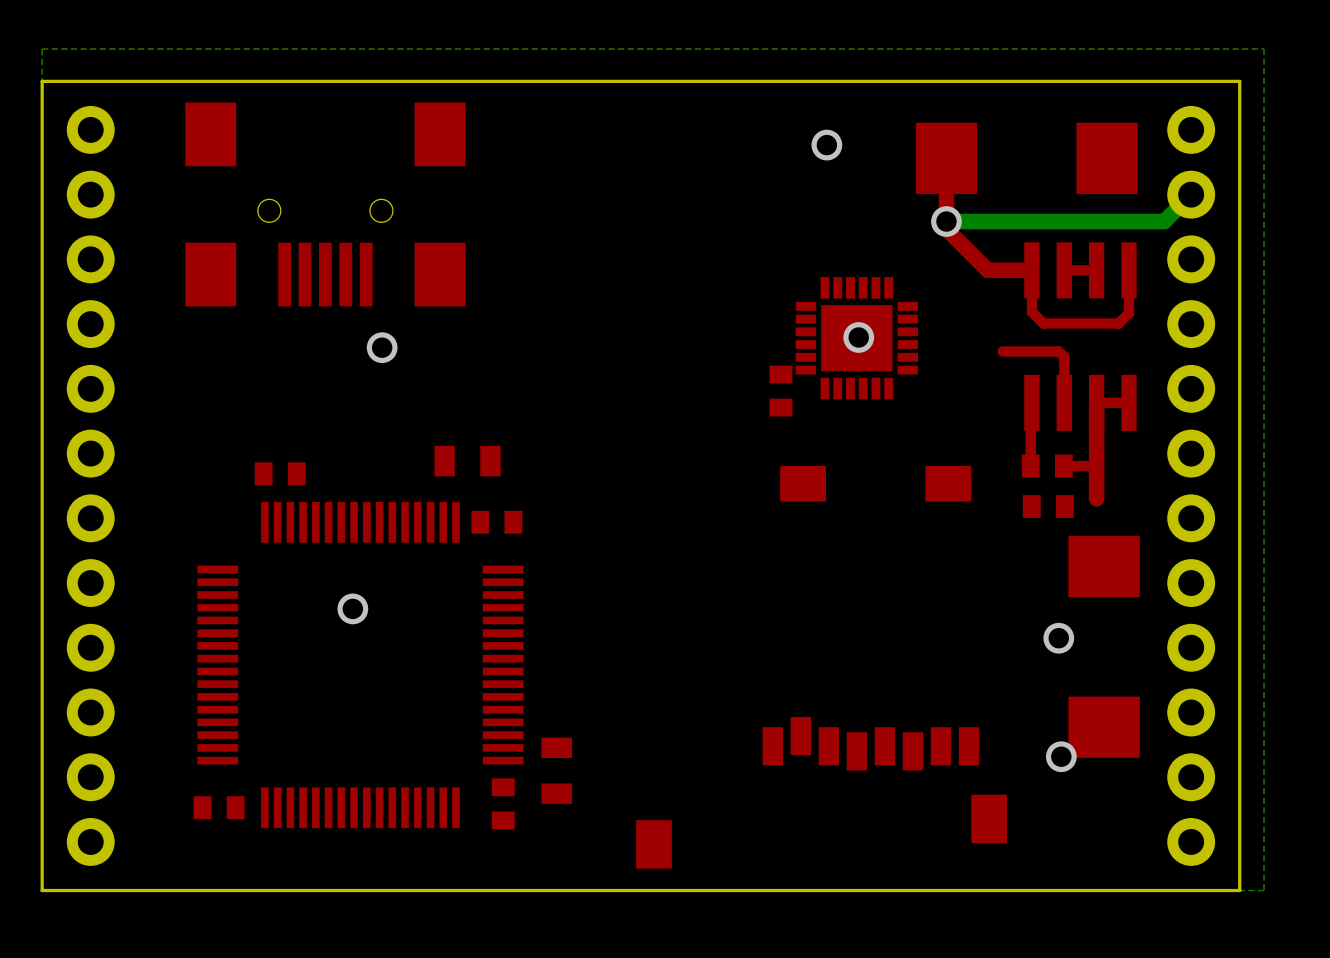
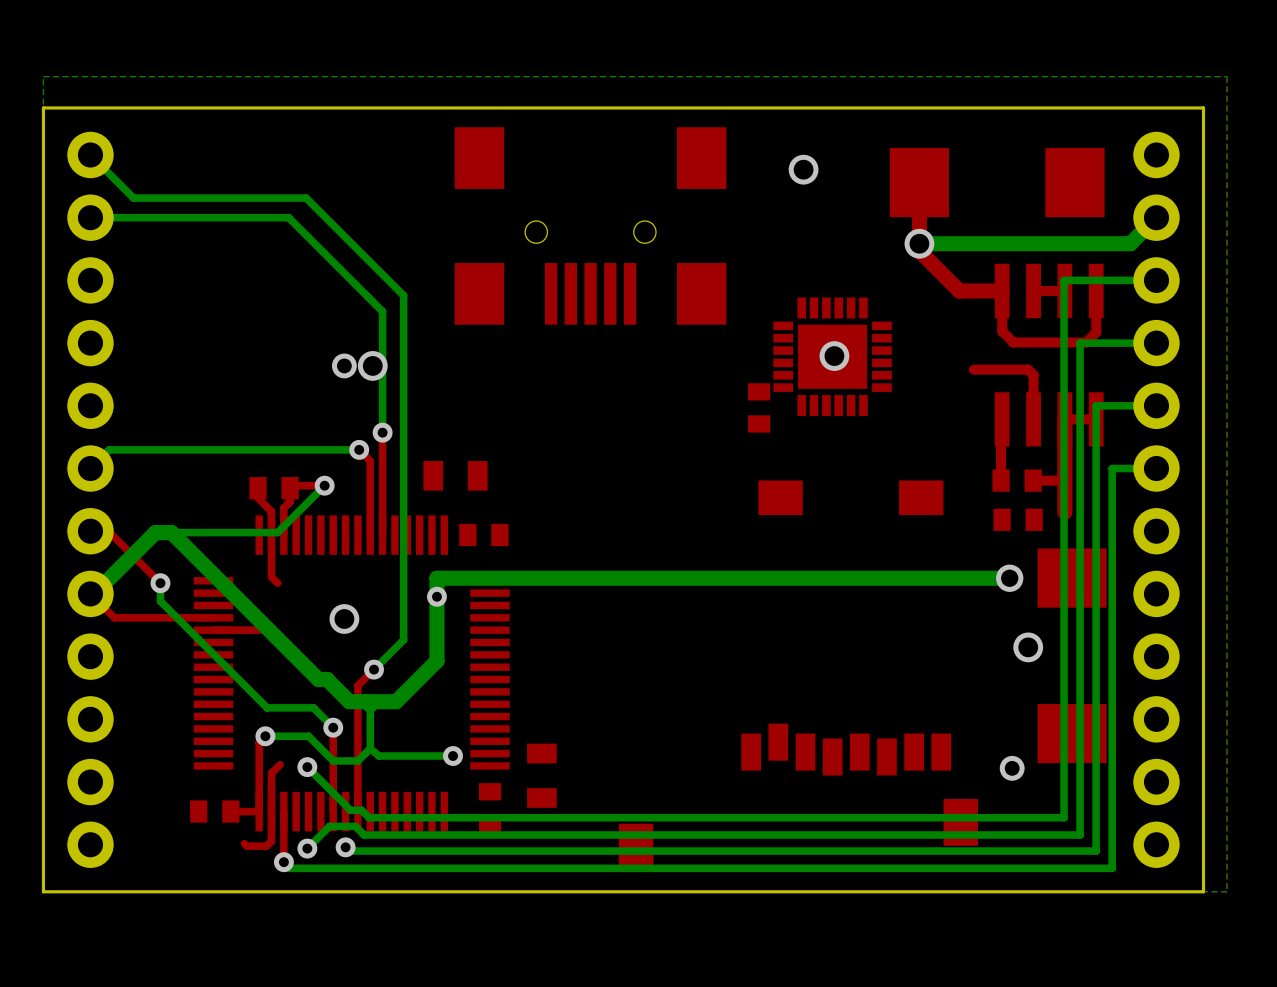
bottom track: none -> (90, 154) (133, 198) (306, 198) (403, 295) (403, 639) (374, 669)
bottom track: none -> (90, 217) (288, 217) (382, 311) (382, 432)
part position: (325, 204) -> (590, 225)
bottom track: none -> (1156, 280) (1064, 280) (1064, 817) (369, 817) (361, 810) (350, 810) (307, 767)
bottom track: none -> (1156, 343) (1080, 343) (1080, 835) (364, 835) (355, 826) (329, 826) (307, 848)
via: none -> (344, 365)
bottom track: none -> (1156, 405) (1096, 405) (1096, 851) (345, 851) (345, 847)
top track: none -> (382, 432) (382, 535)
via: none -> (382, 432)
top track: none -> (359, 449) (370, 460) (370, 535)
bottom track: none -> (359, 449) (109, 449) (90, 468)
via: none -> (359, 449)
bottom track: none -> (1156, 468) (1112, 468) (1112, 868) (283, 868) (283, 862)
top track: none -> (324, 485) (292, 485) (290, 488) (290, 501) (283, 507) (283, 535)
bottom track: none -> (324, 485) (277, 532) (171, 532)
via: none -> (324, 485)
top track: none -> (257, 488) (257, 498) (271, 511) (271, 576) (277, 583)
top track: none -> (90, 531) (108, 531) (160, 583)
bottom track: none -> (171, 532) (155, 532) (94, 593) (90, 593)
bottom track: none -> (171, 532) (318, 679) (327, 679) (349, 701) (396, 701) (436, 660) (436, 578) (1009, 578)
via: none -> (1009, 578)
bottom track: none -> (160, 583) (160, 601) (267, 707) (313, 707) (333, 727)
via: none -> (160, 583)
top track: none -> (90, 593) (114, 617) (213, 617)
via: none -> (436, 596)
top track: none -> (260, 630) (213, 630)
top track: none -> (374, 669) (357, 685) (357, 811)
via: none -> (374, 669)
bottom track: none -> (366, 701) (370, 705) (370, 748)
top track: none -> (333, 727) (333, 811)
via: none -> (333, 727)
top track: none -> (265, 736) (259, 742) (259, 811) (230, 811)
bottom track: none -> (265, 736) (308, 736) (333, 760) (357, 760) (370, 748)
via: none -> (265, 736)
bottom track: none -> (370, 748) (378, 756) (453, 756)
via: none -> (453, 756)
via position: (1061, 756) -> (1012, 768)
top track: none -> (280, 764) (271, 773) (271, 841) (266, 846) (246, 846) (244, 843)
via: none -> (307, 767)
top track: none -> (283, 811) (283, 862)
via: none -> (345, 847)
via: none -> (307, 848)
via: none -> (283, 862)

